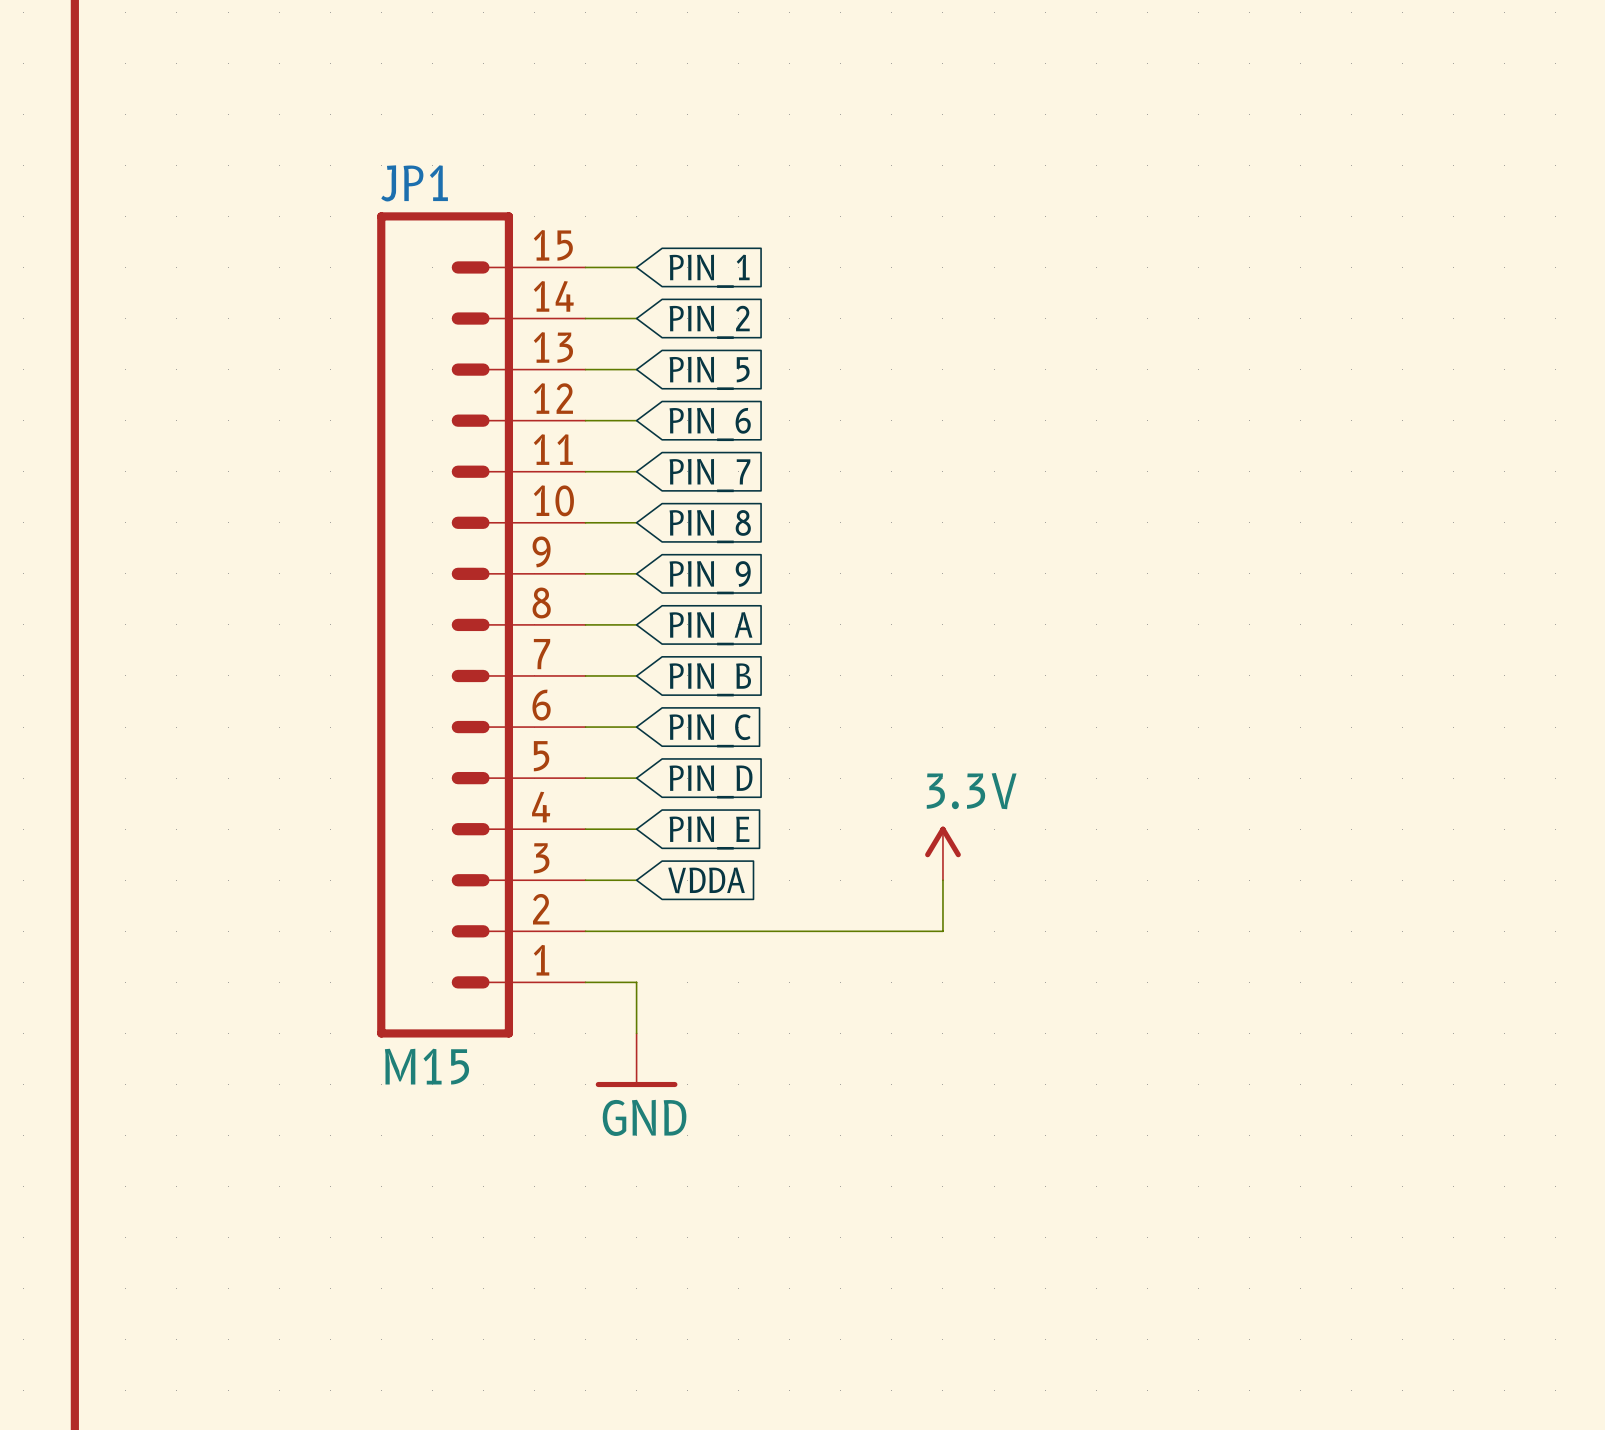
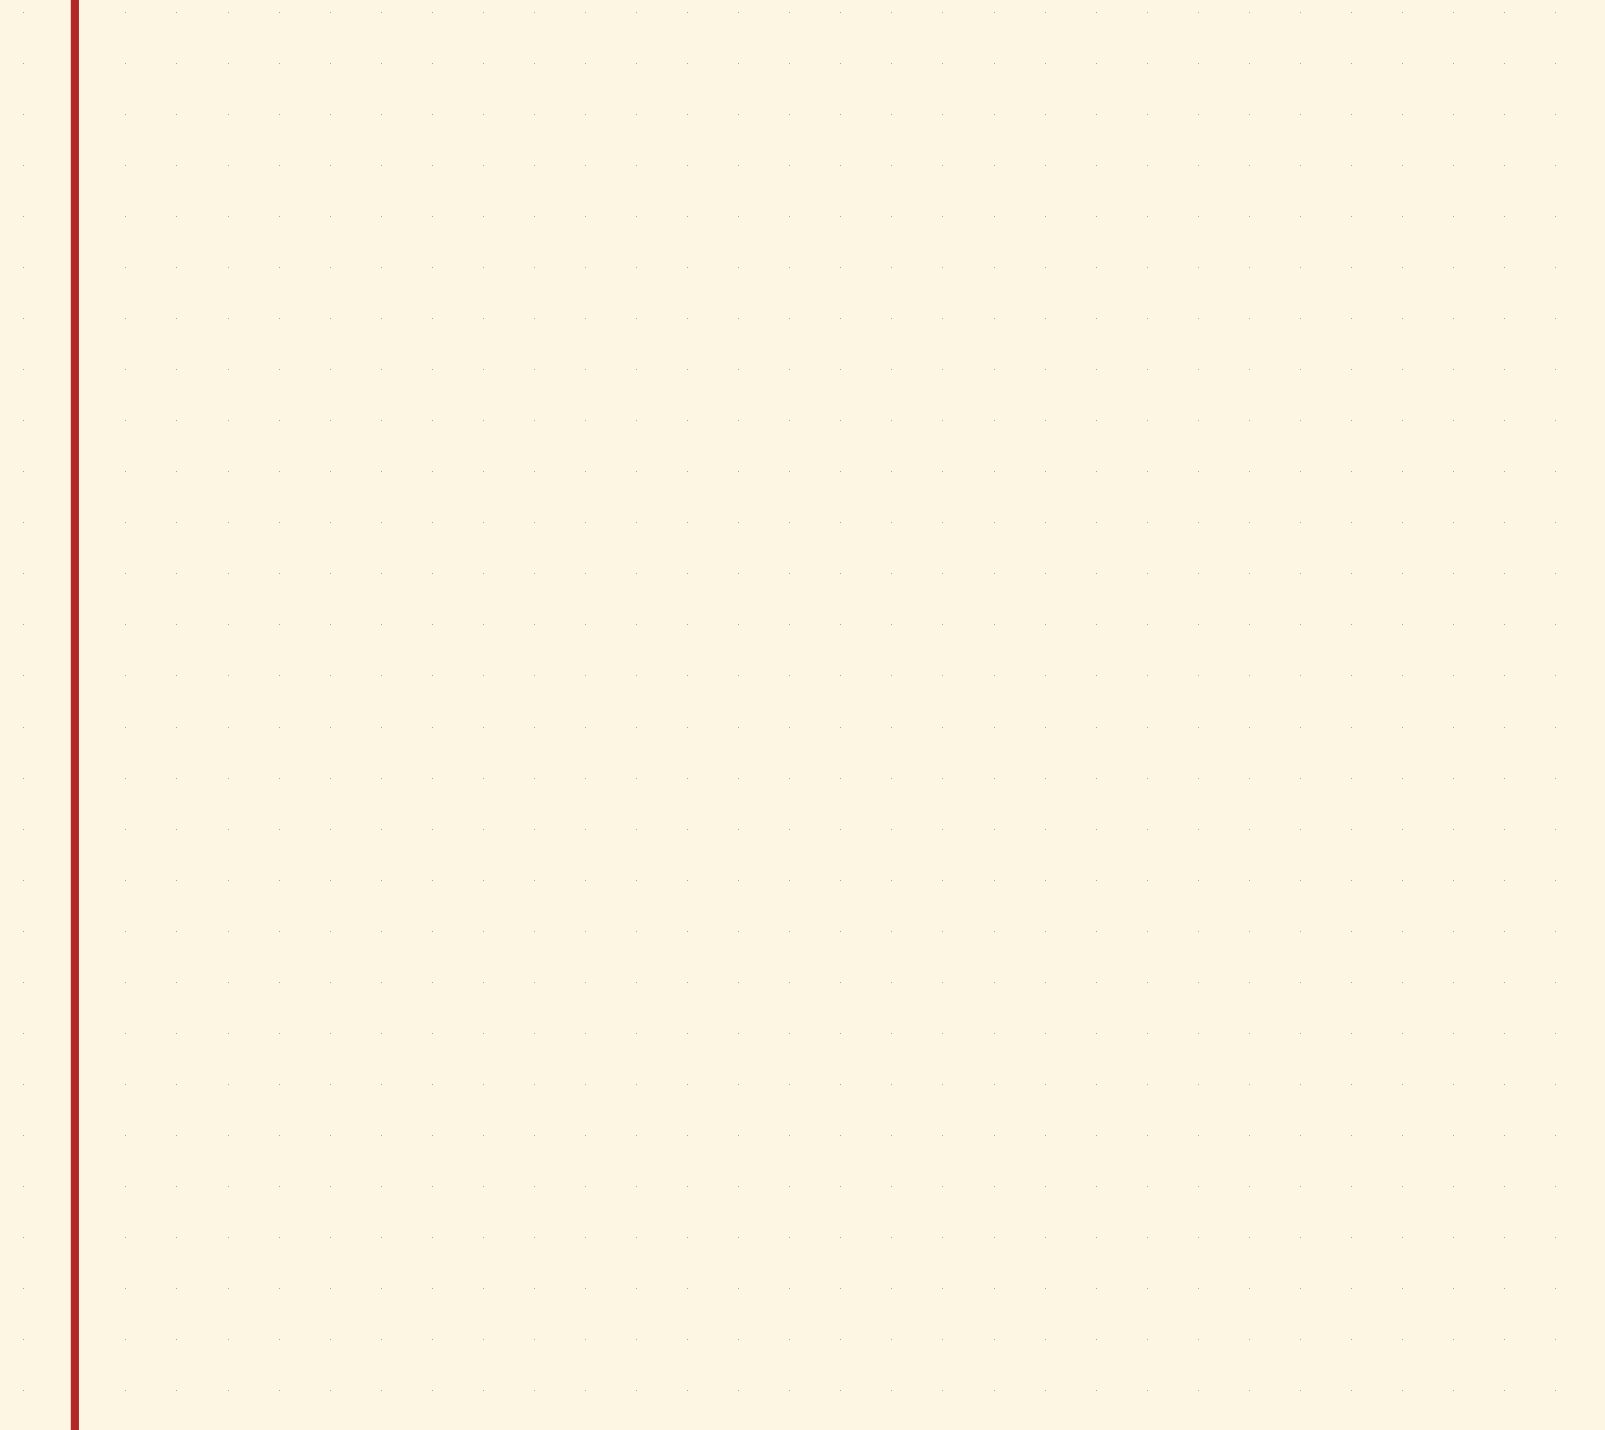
wire: (585, 267) (636, 267) -> none
global label: PIN_1 (709, 271) -> none
wire: (585, 318) (636, 318) -> none
global label: PIN_2 (709, 322) -> none
wire: (585, 369) (636, 369) -> none
global label: PIN_5 (709, 373) -> none
wire: (585, 420) (636, 420) -> none
global label: PIN_6 (710, 424) -> none
wire: (585, 471) (636, 471) -> none
global label: PIN_7 (709, 475) -> none
wire: (585, 522) (636, 522) -> none
global label: PIN_8 (710, 526) -> none
wire: (585, 573) (636, 573) -> none
global label: PIN_9 (710, 577) -> none
JP1: M15 (481, 624) -> none
wire: (585, 624) (636, 624) -> none
global label: PIN_A (710, 628) -> none
wire: (585, 675) (636, 675) -> none
global label: PIN_B (710, 679) -> none
wire: (585, 727) (636, 727) -> none
global label: PIN_C (710, 730) -> none
wire: (585, 778) (636, 778) -> none
global label: PIN_D (711, 781) -> none
wire: (585, 829) (636, 829) -> none
global label: PIN_E (709, 833) -> none
power symbol: 3.3V (942, 853) -> none
wire: (585, 880) (636, 880) -> none
global label: VDDA (706, 880) -> none
wire: (942, 880) (942, 931) (585, 931) -> none
wire: (585, 982) (636, 982) (636, 1033) -> none
power symbol: GND (636, 1060) -> none

